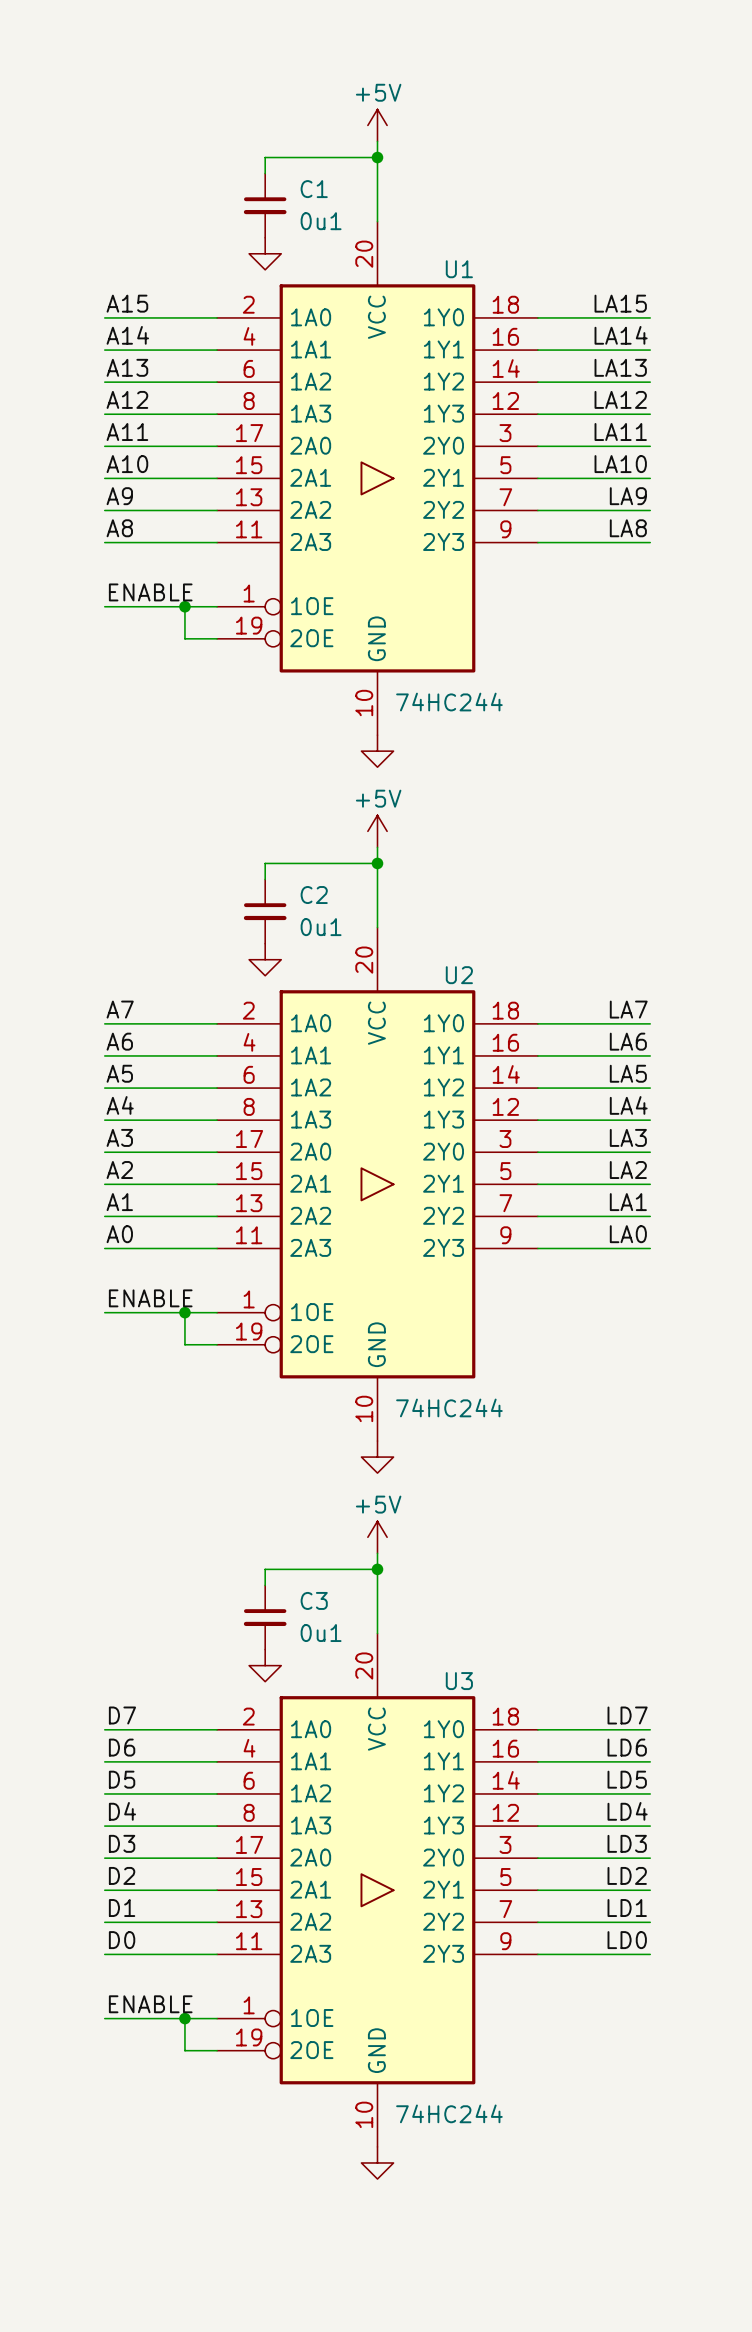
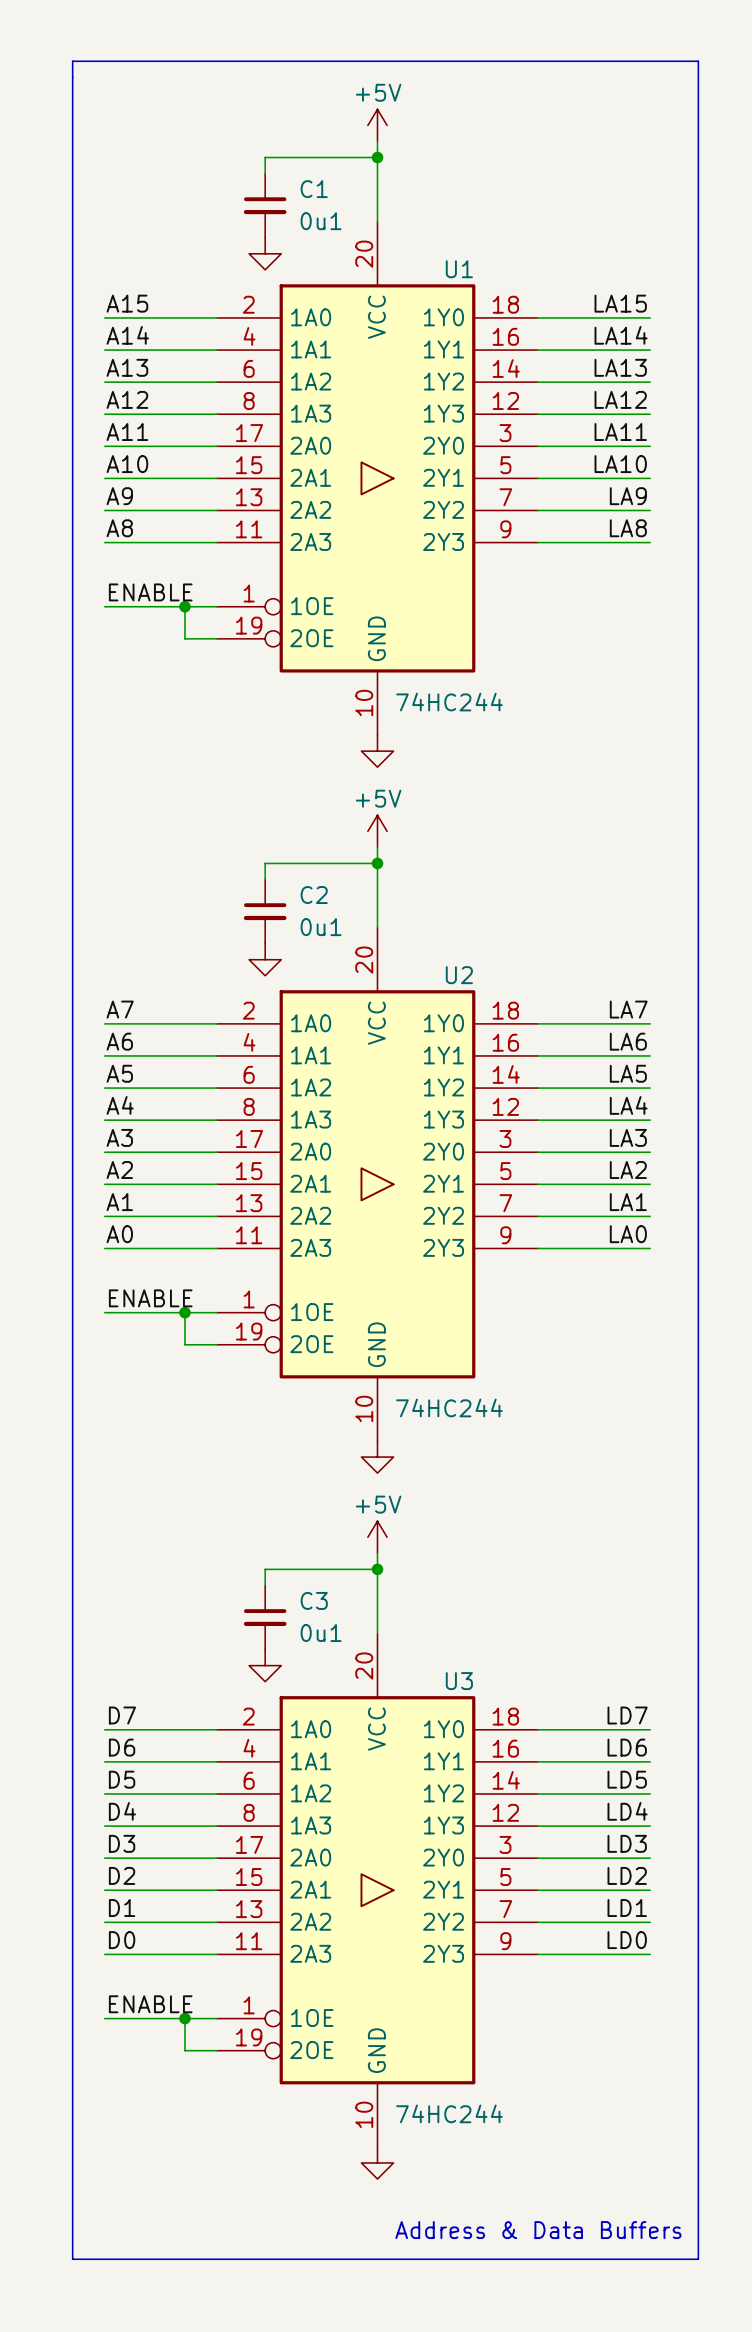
line: none -> (72, 61) (72, 2259) (698, 2259) (698, 61) (72, 61)
text: none -> Address & Data Buffers (538, 2230)

